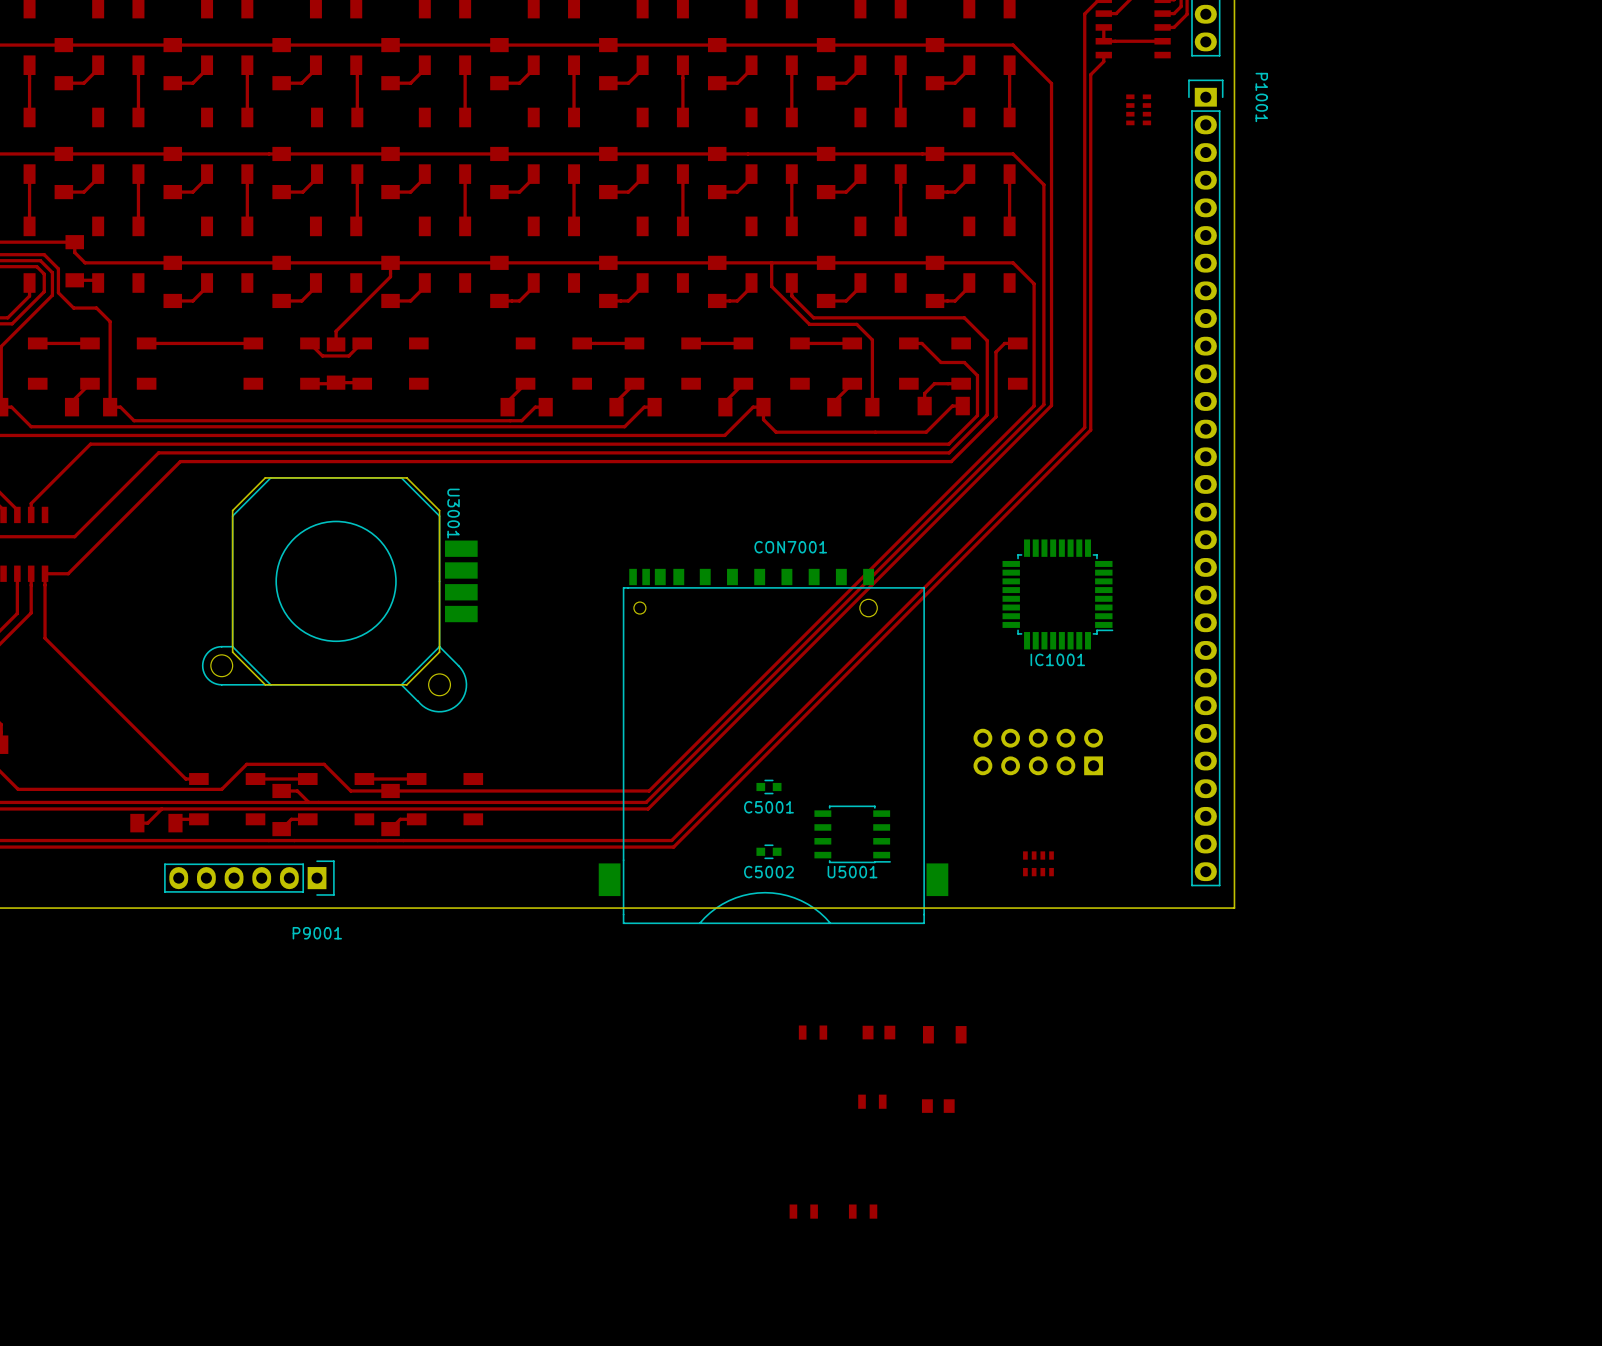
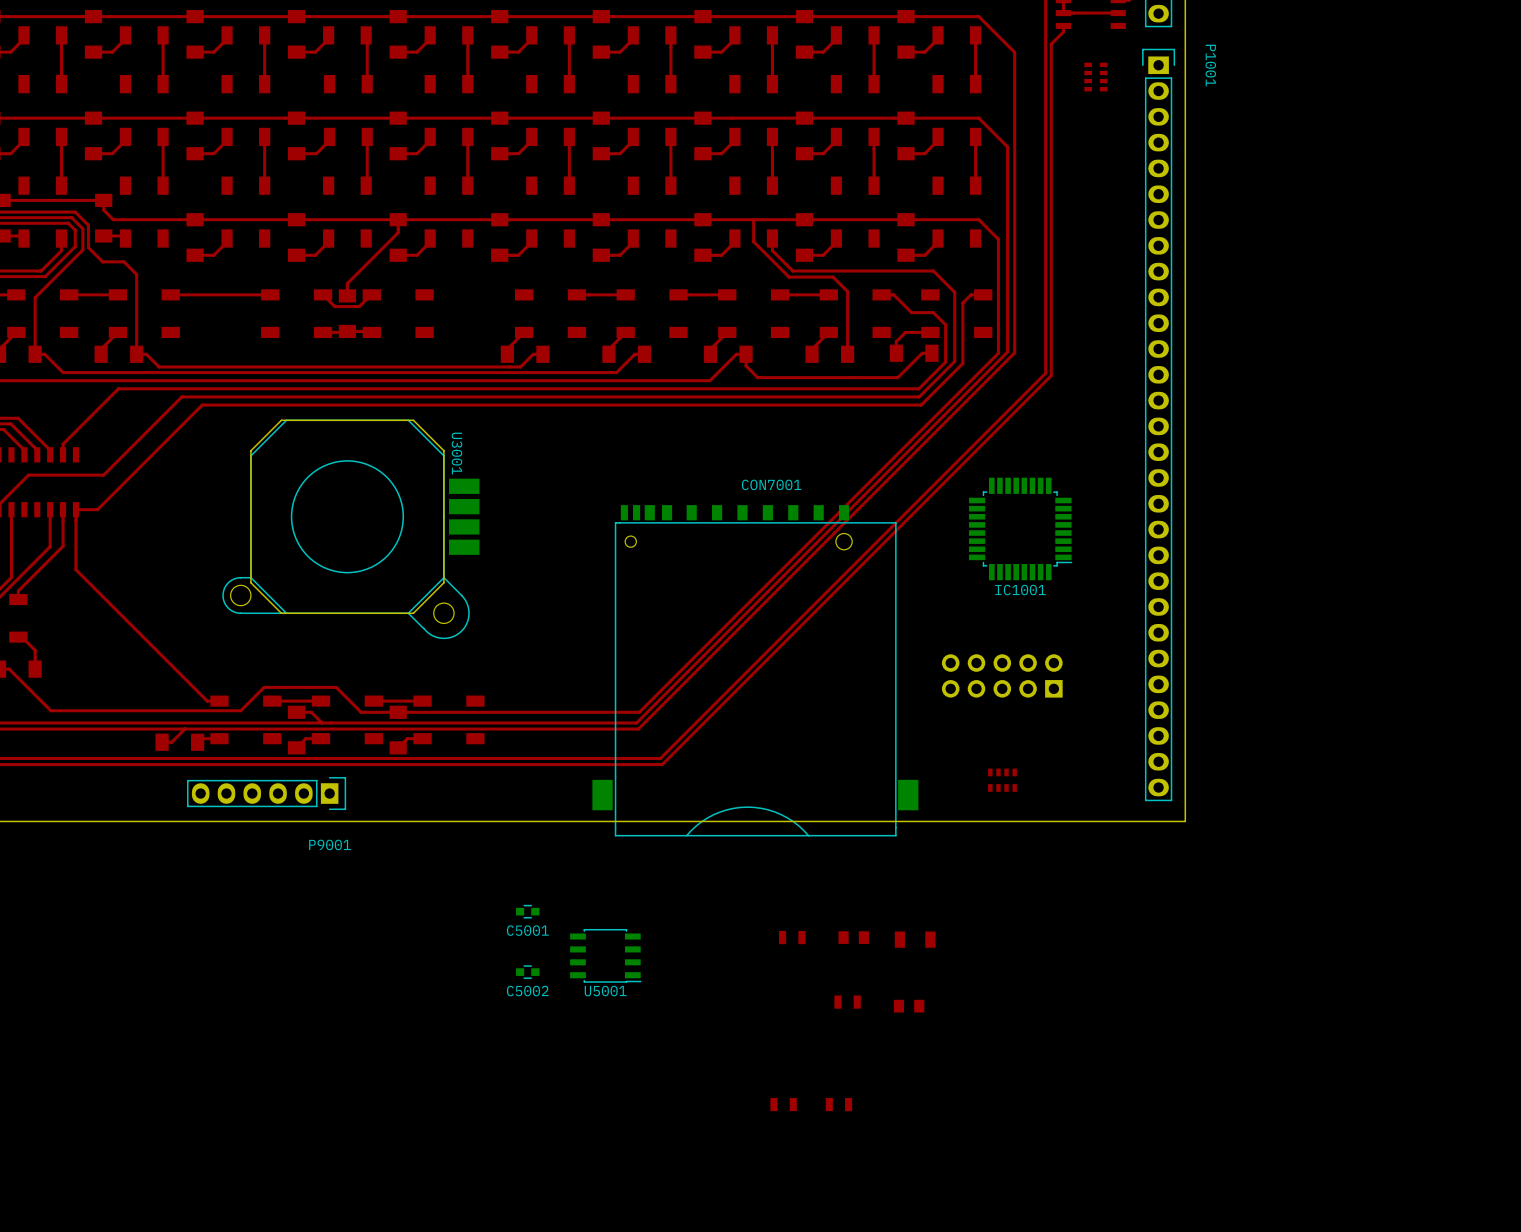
C5001 position: (768, 787) -> (527, 911)
U5001 position: (852, 834) -> (605, 955)
C5002 position: (768, 851) -> (527, 972)

